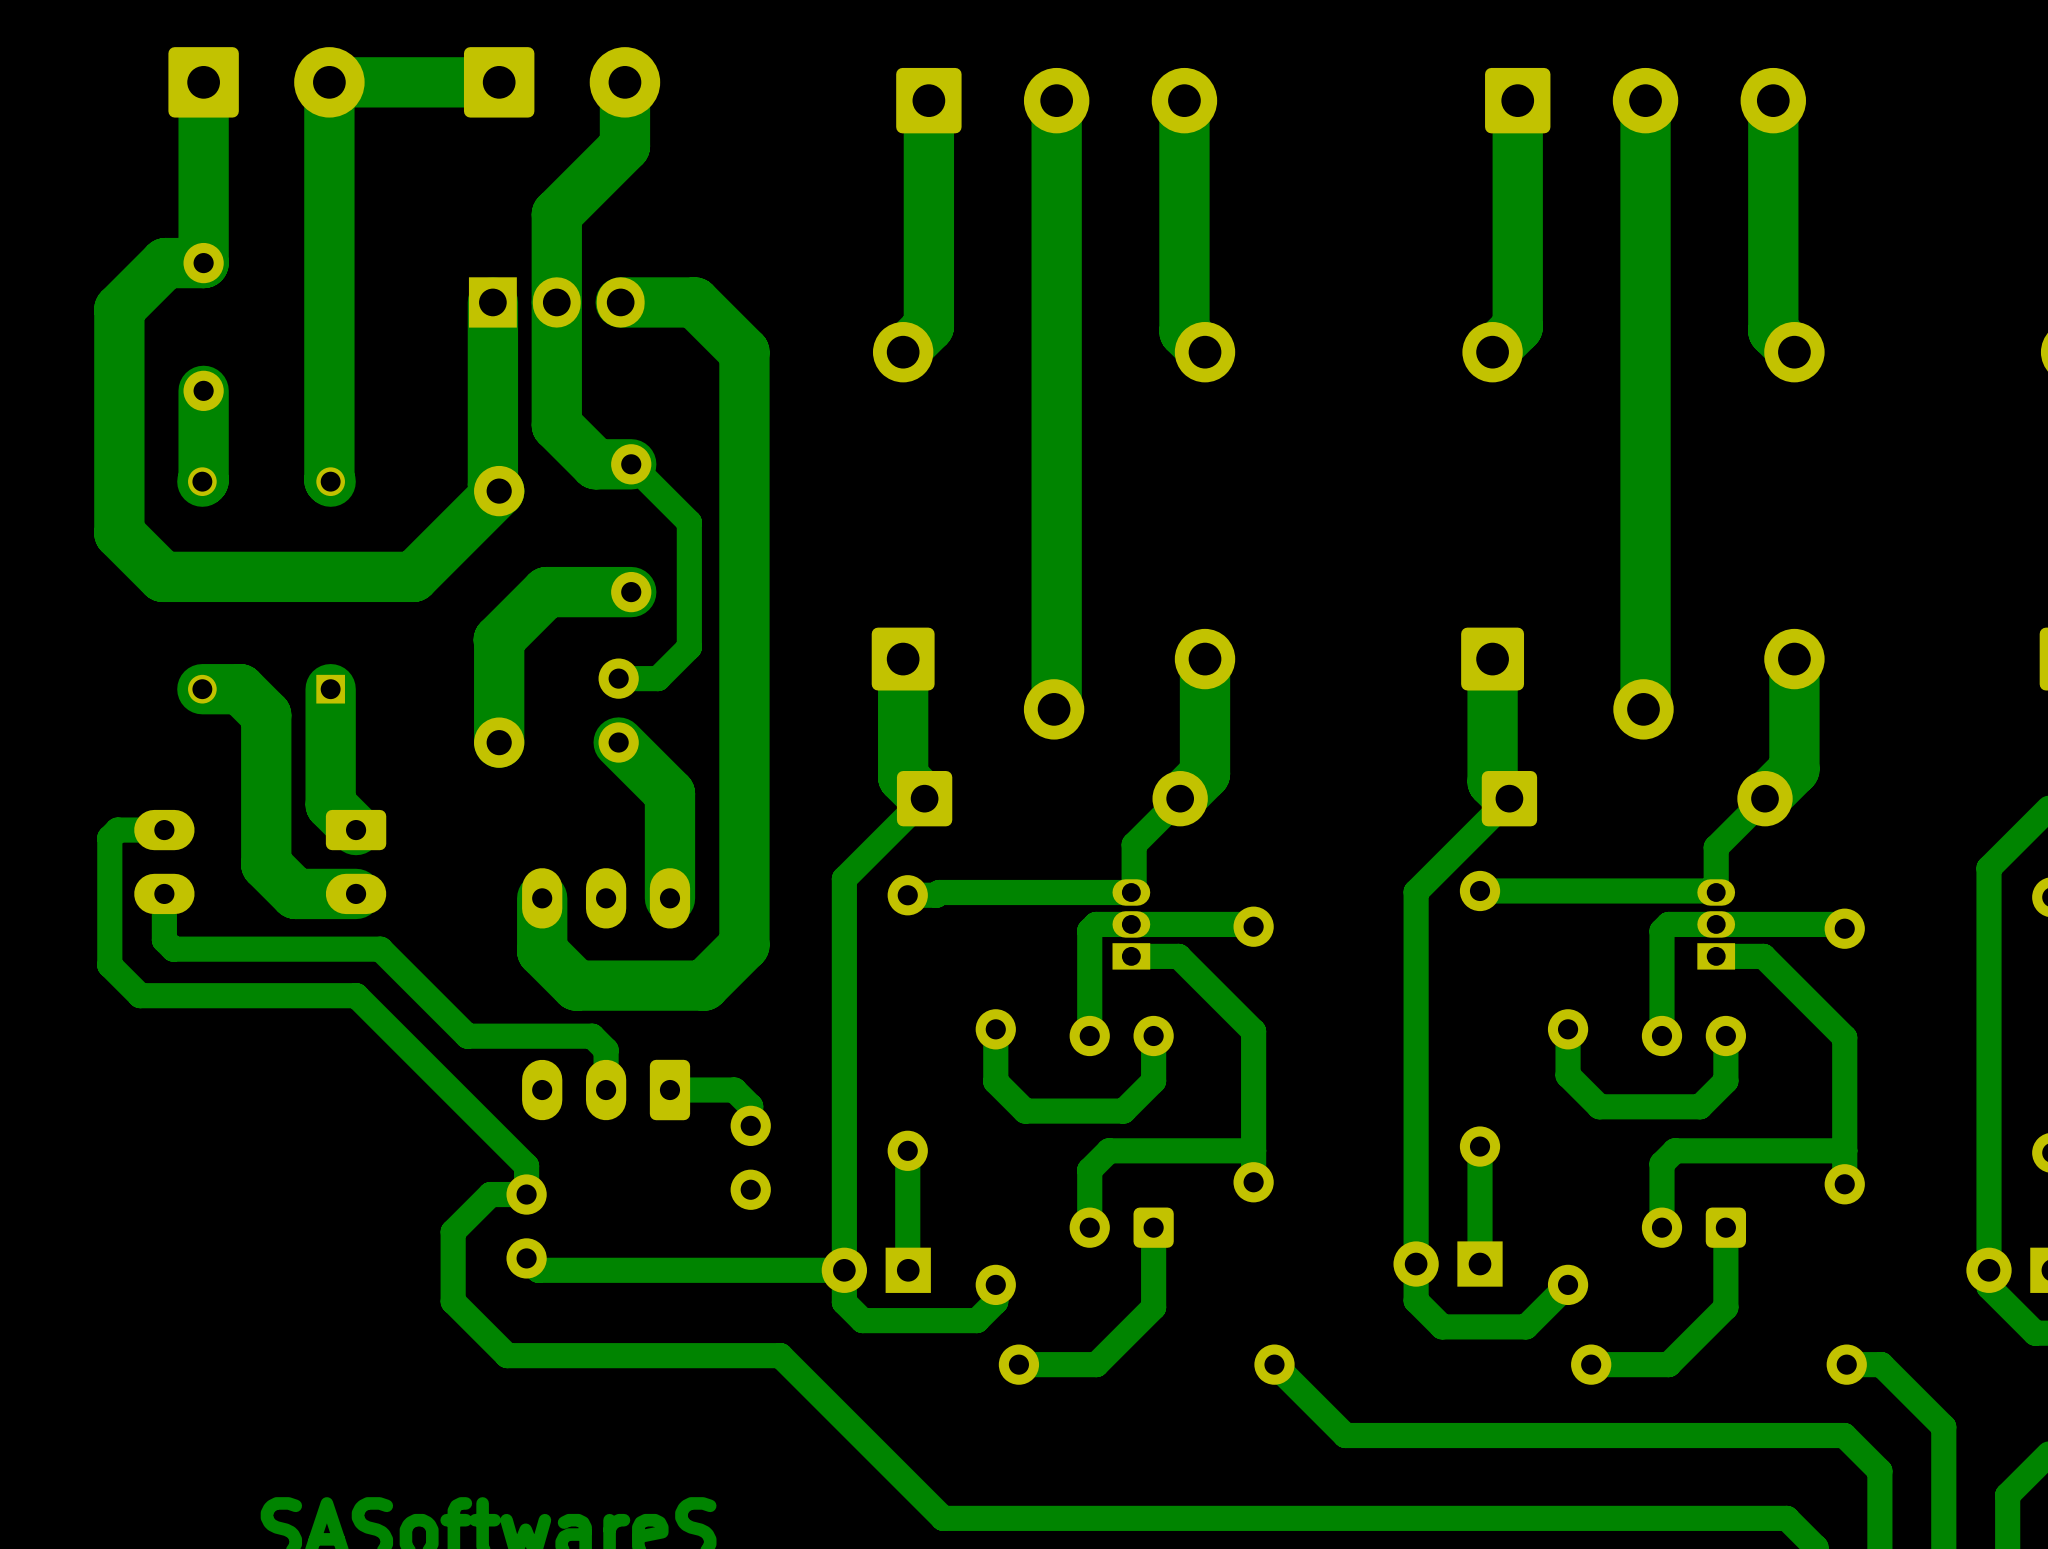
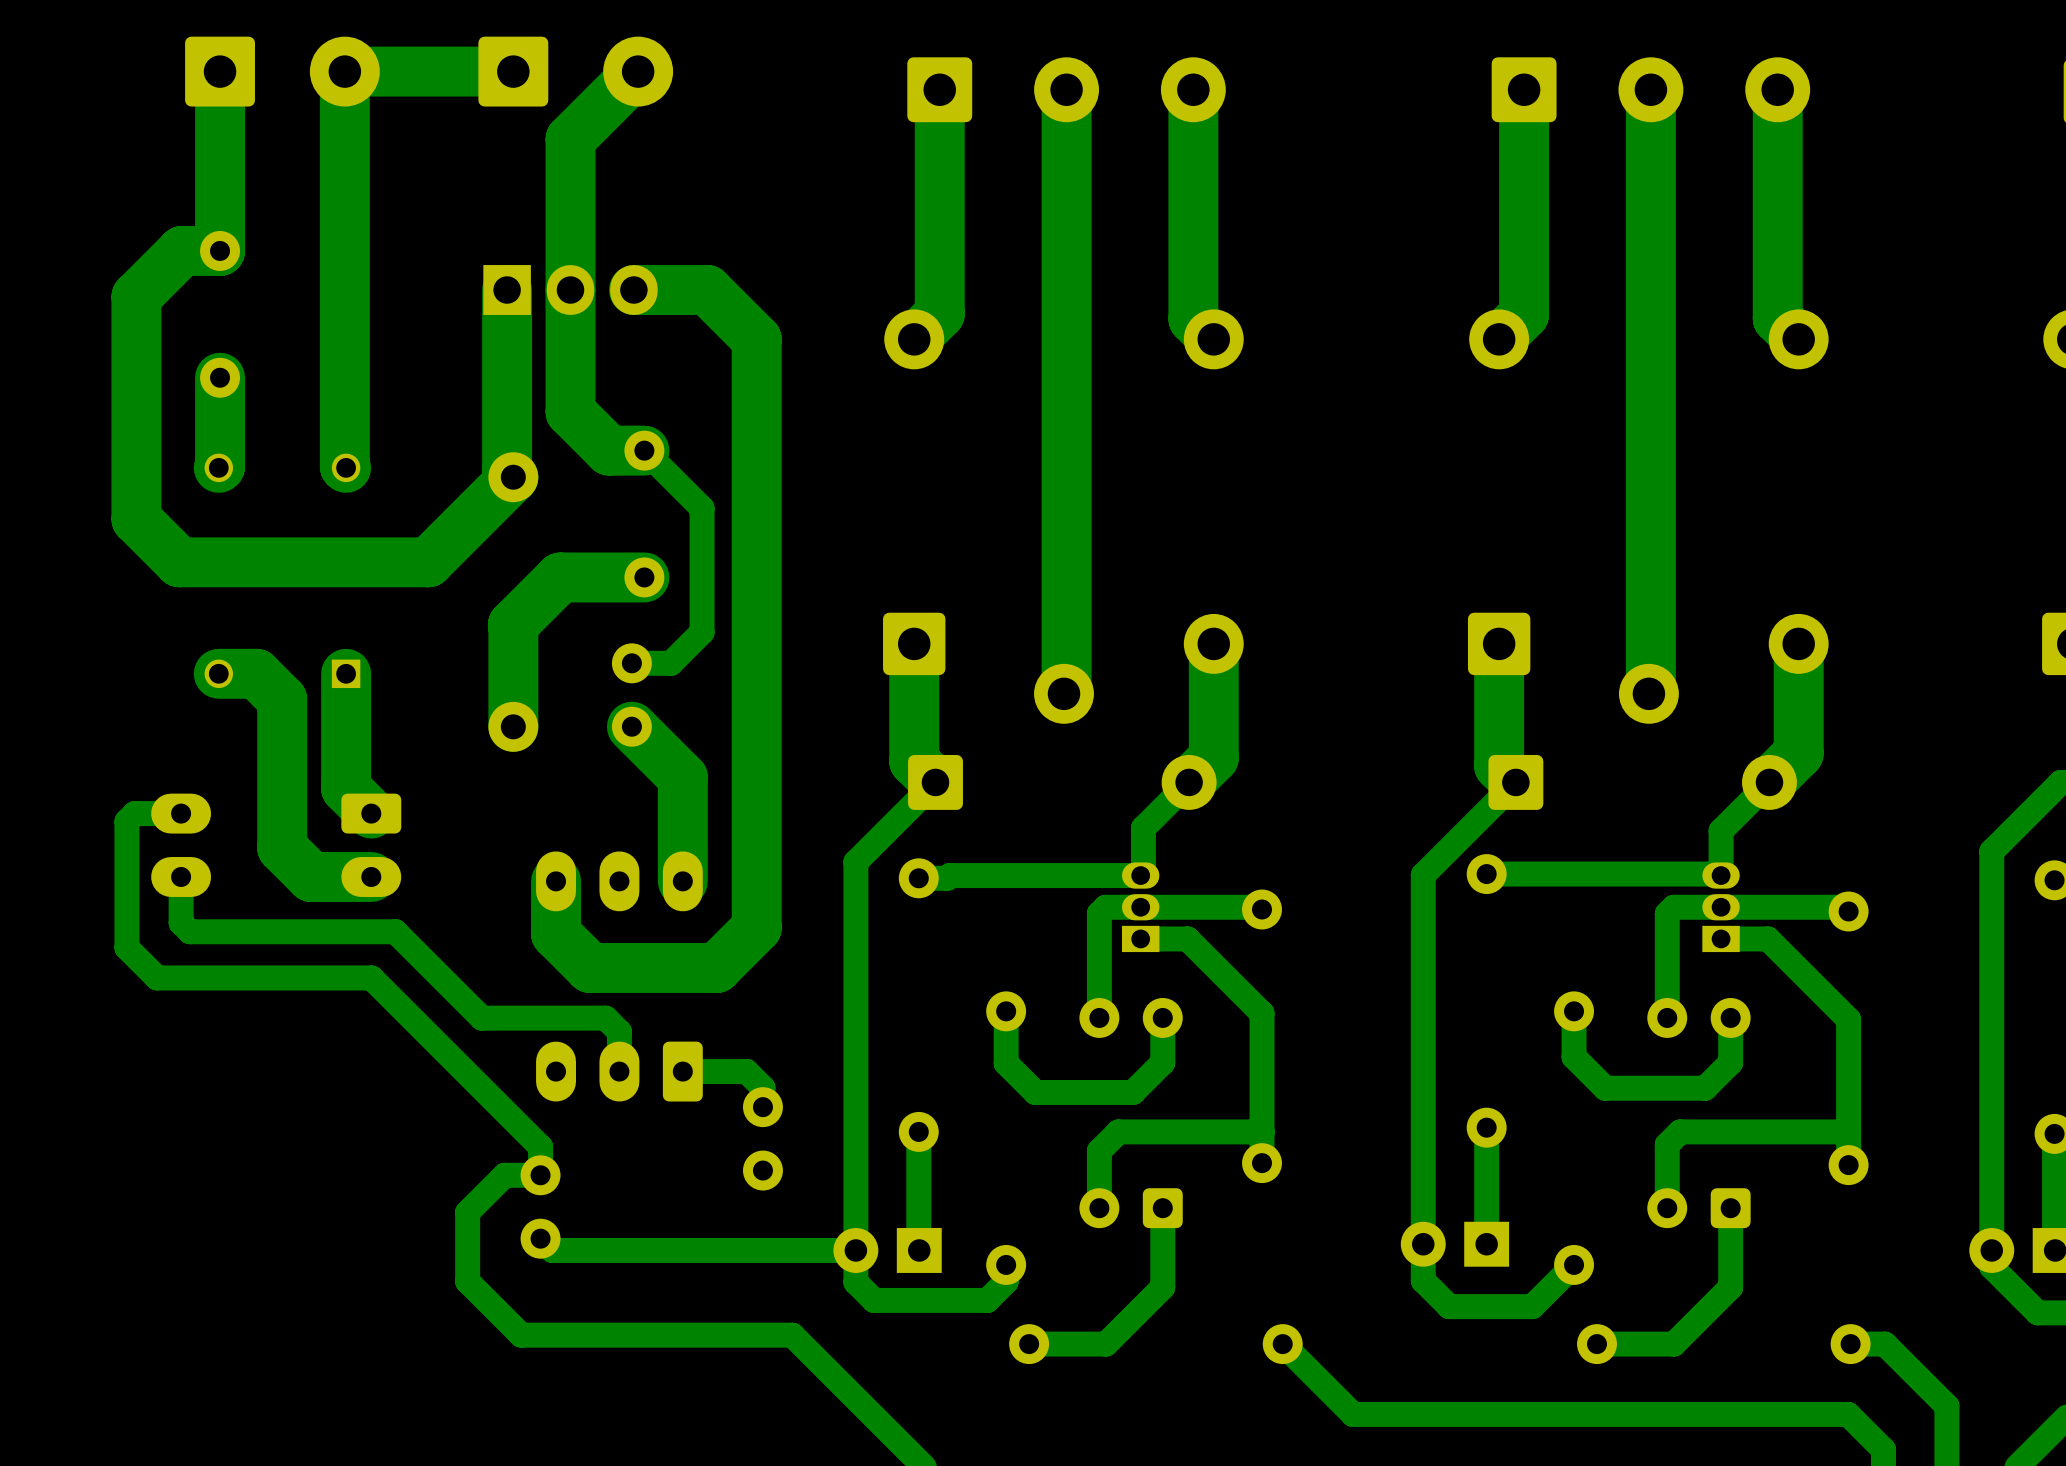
track: (624, 82) (624, 146) (556, 214) -> (638, 71) (570, 139) (570, 202)

